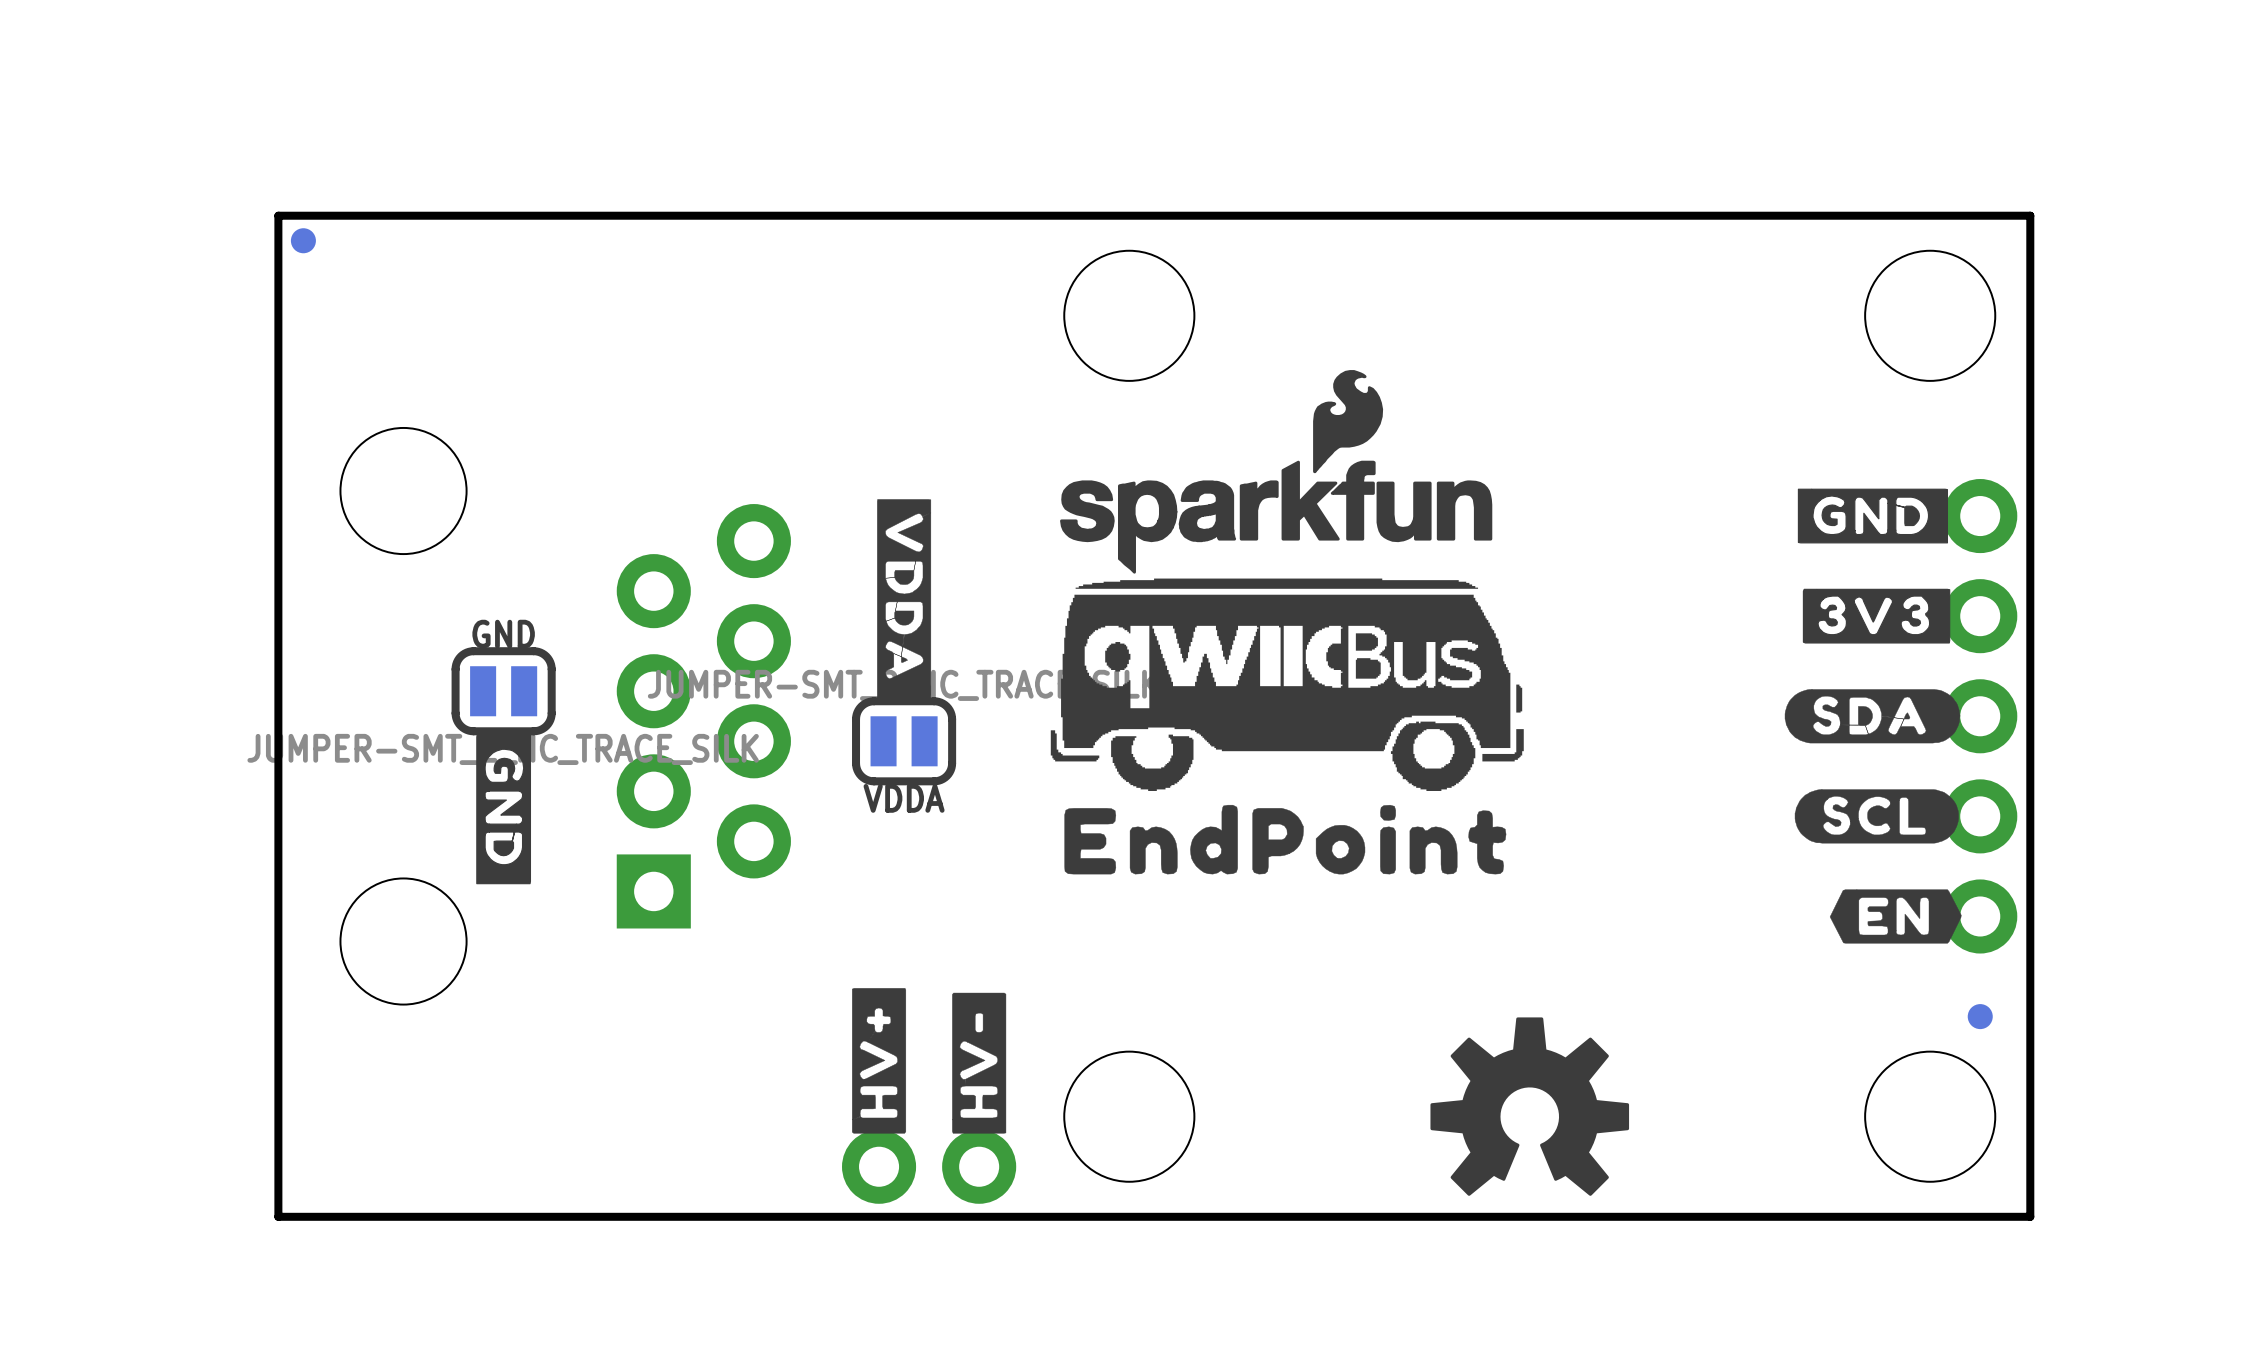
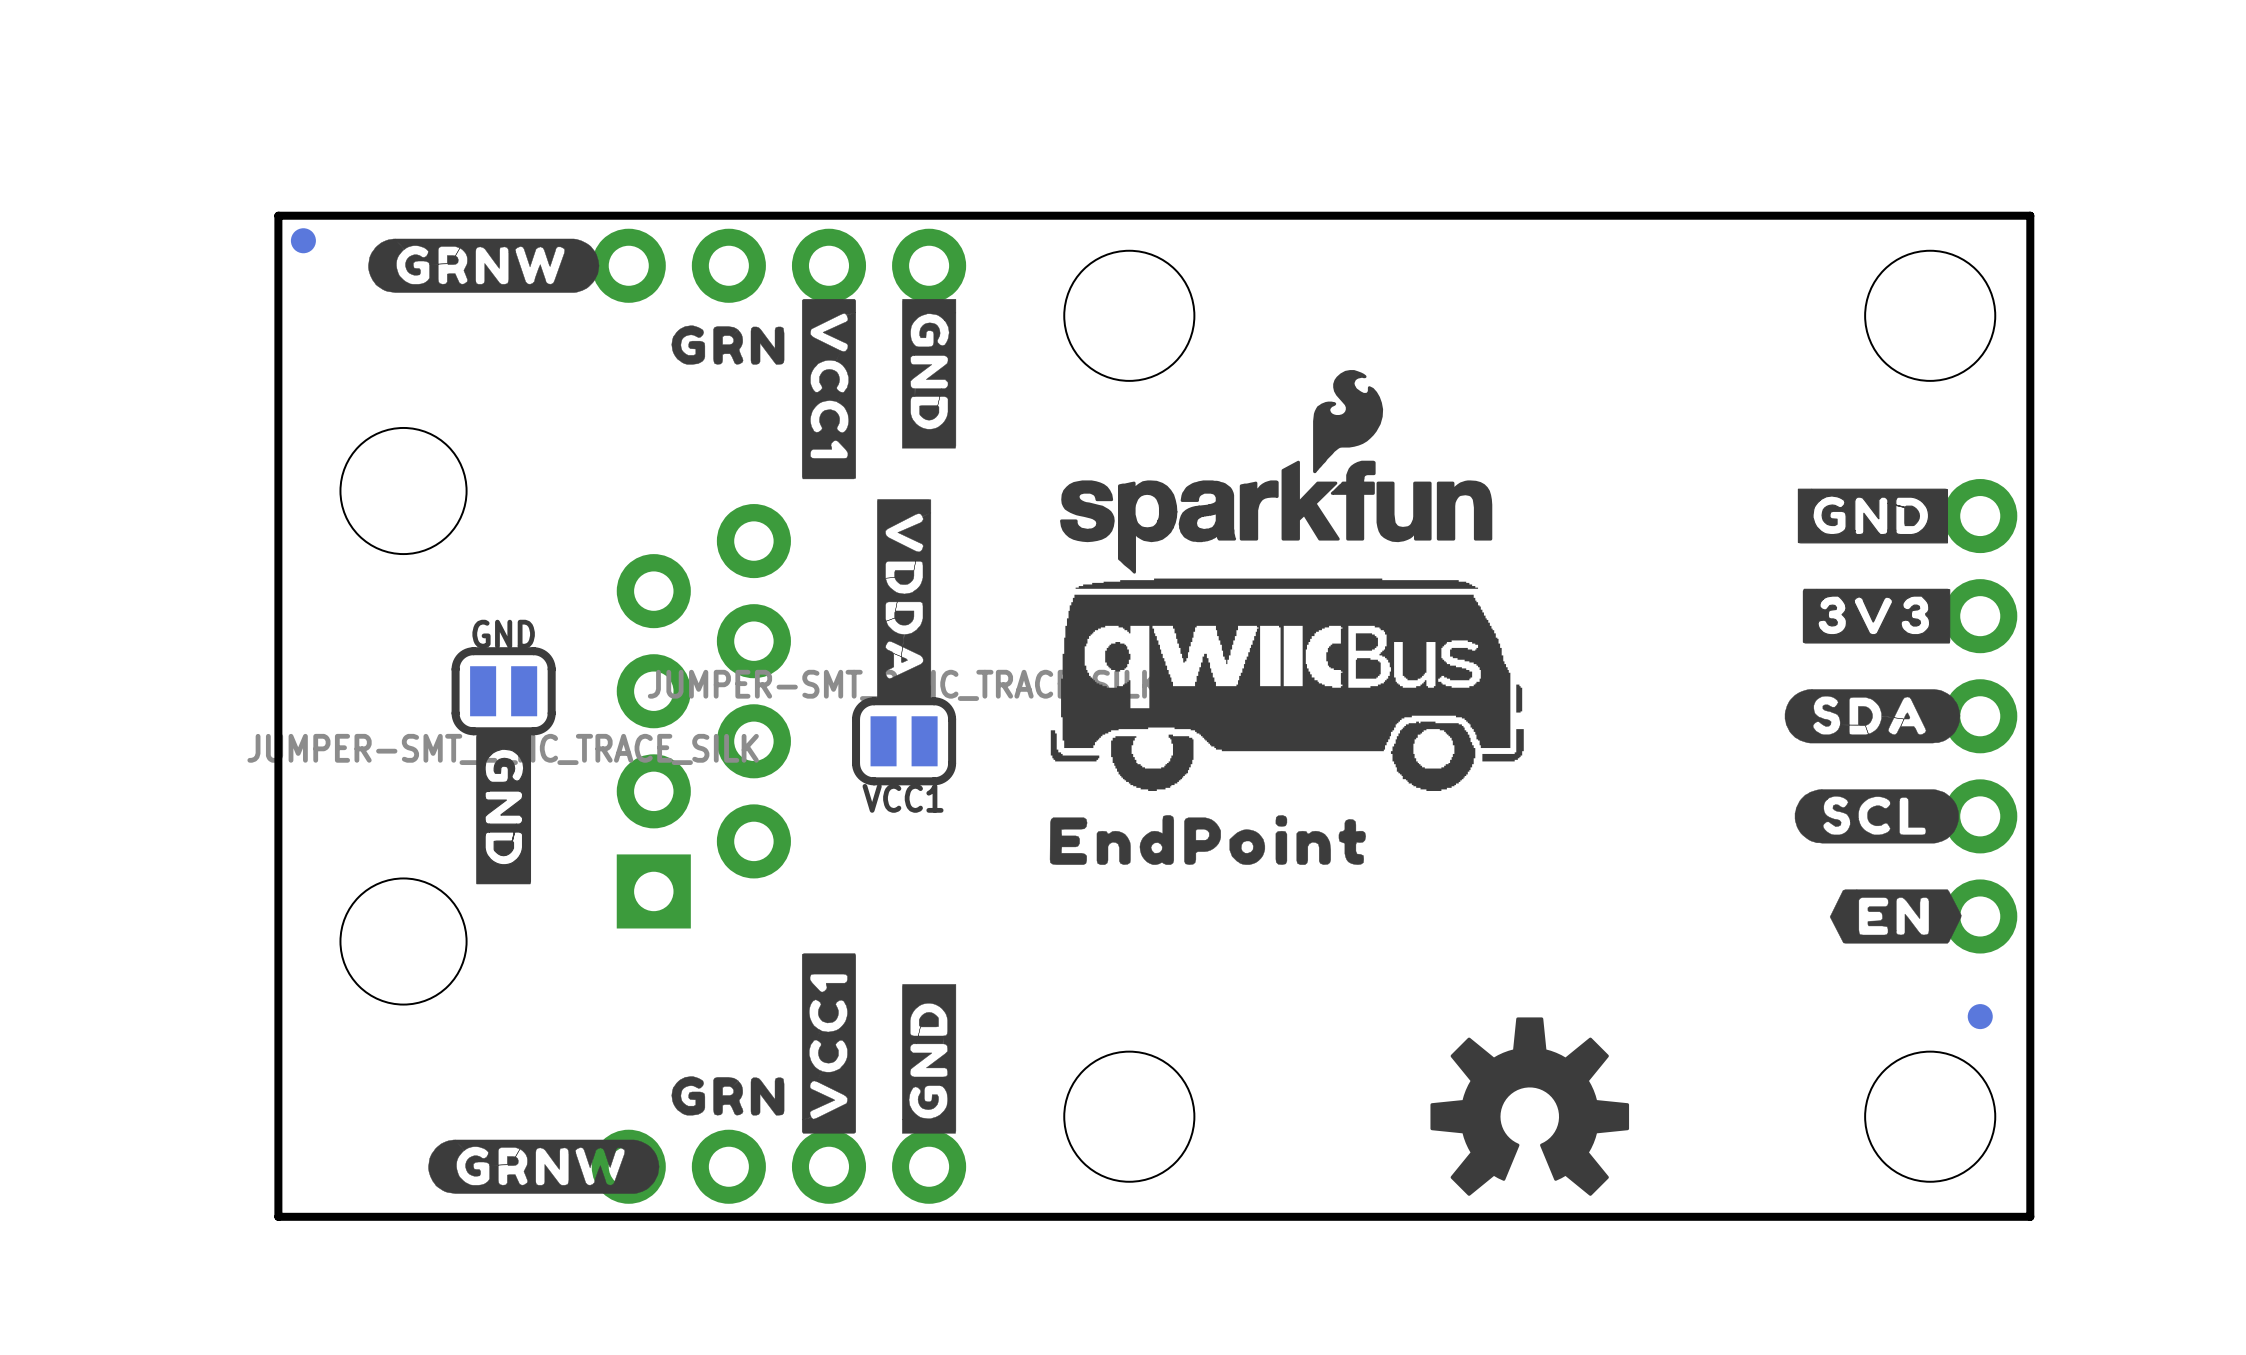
drawing: none -> [368, 238, 600, 293]
part: none -> (778, 265)
drawing: none -> [671, 299, 957, 480]
VDDA name: VDDA (904, 798) -> VCC1 (903, 798)
drawing: [1064, 804, 1507, 875] -> none
drawing: none -> [1049, 815, 1366, 865]
drawing: none -> [428, 953, 957, 1194]
drawing: [852, 988, 1007, 1134] -> none
part: none -> (778, 1166)
part: (929, 1166) -> none

